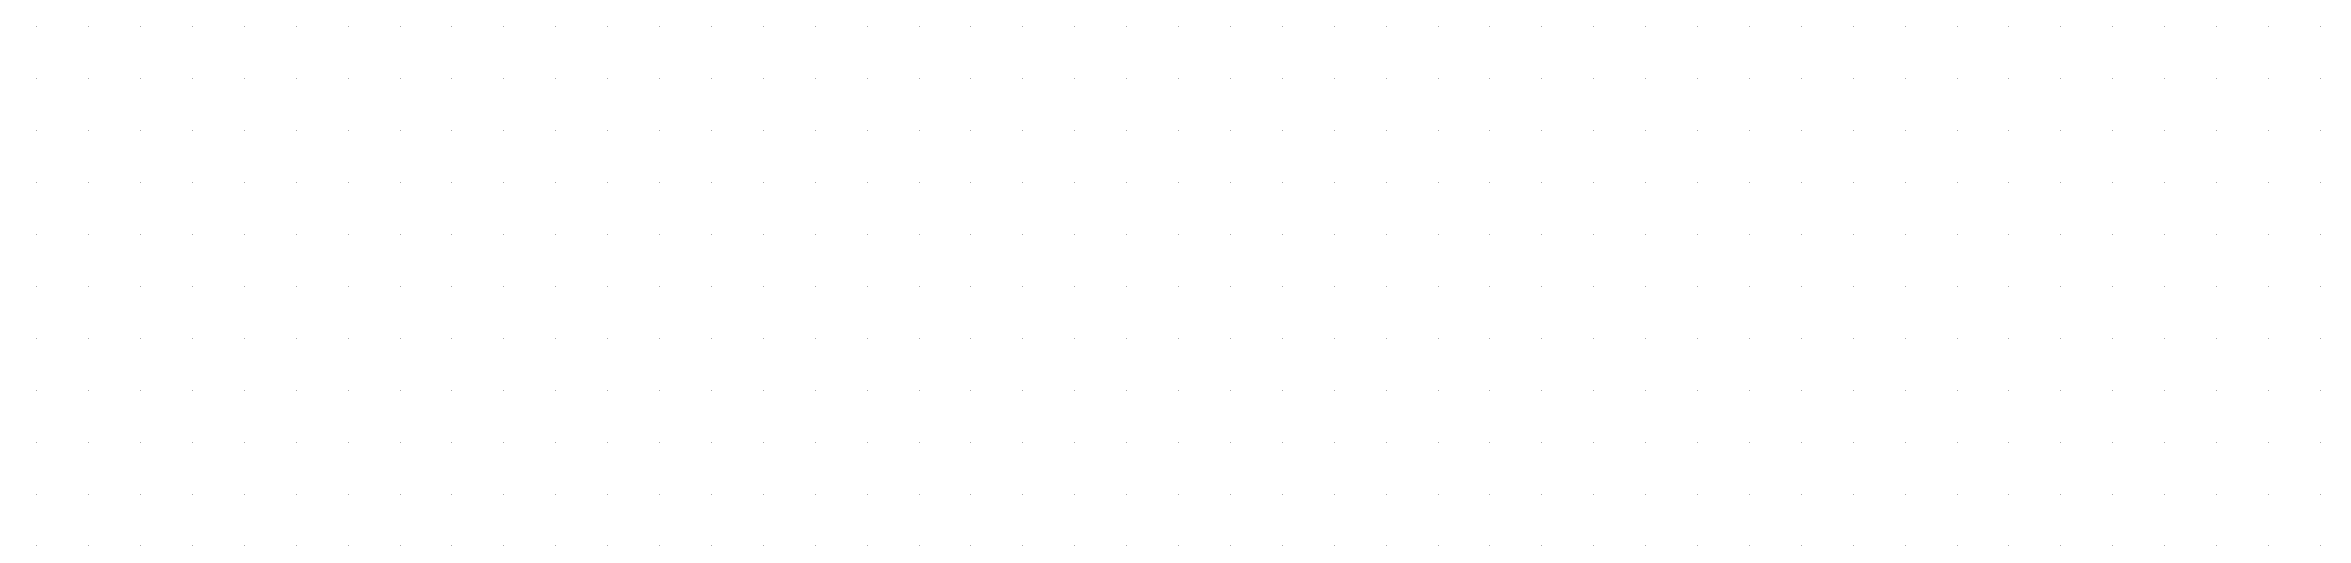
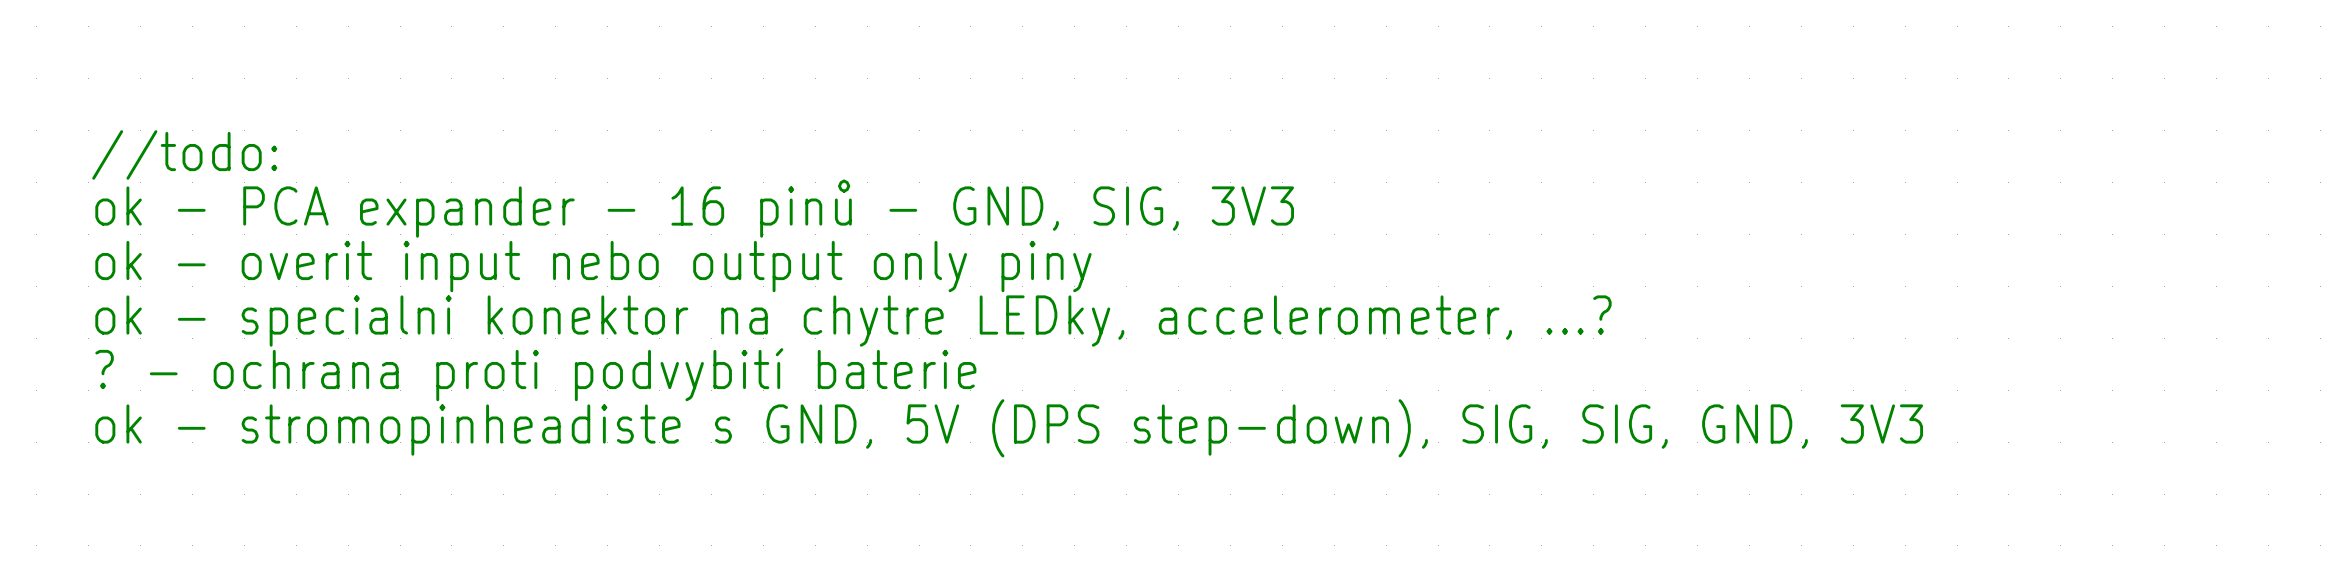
text: none -> //todo: (184, 154)
text: none -> ok - PCA expander - 16 pinů - GND, SIG, 3V3 (694, 208)
text: none -> ok - overit input nebo output only piny (593, 266)
text: none -> ok - specialni konektor na chytre LEDky, accelerometer, ...? (853, 321)
text: none -> ? - ochrana proti podvybití baterie (535, 374)
text: none -> ok - stromopinheadiste s GND, 5V (DPS step-down), SIG, SIG, GND, 3V3 (1009, 428)

